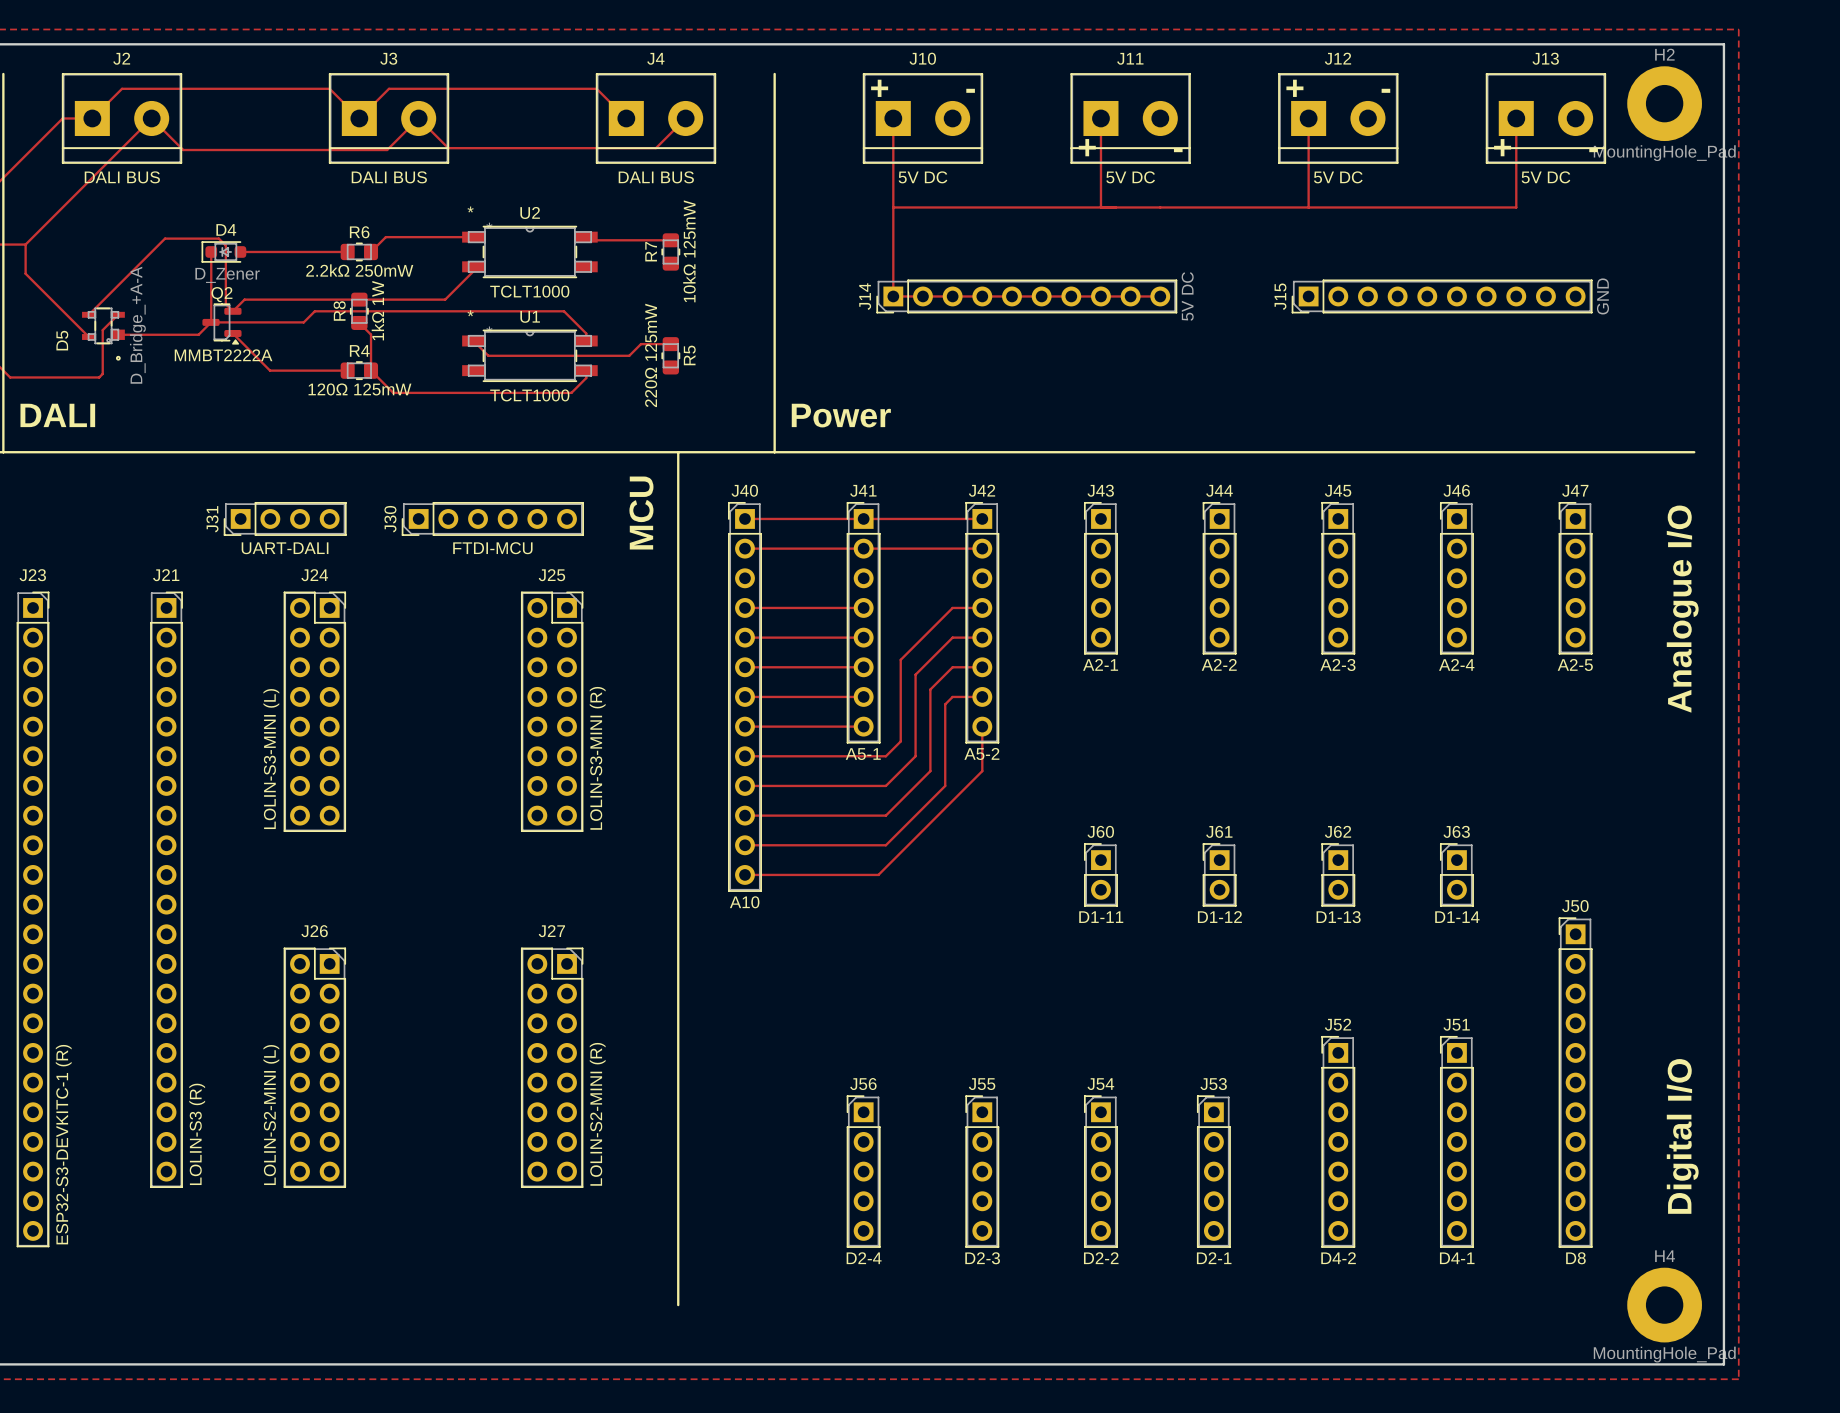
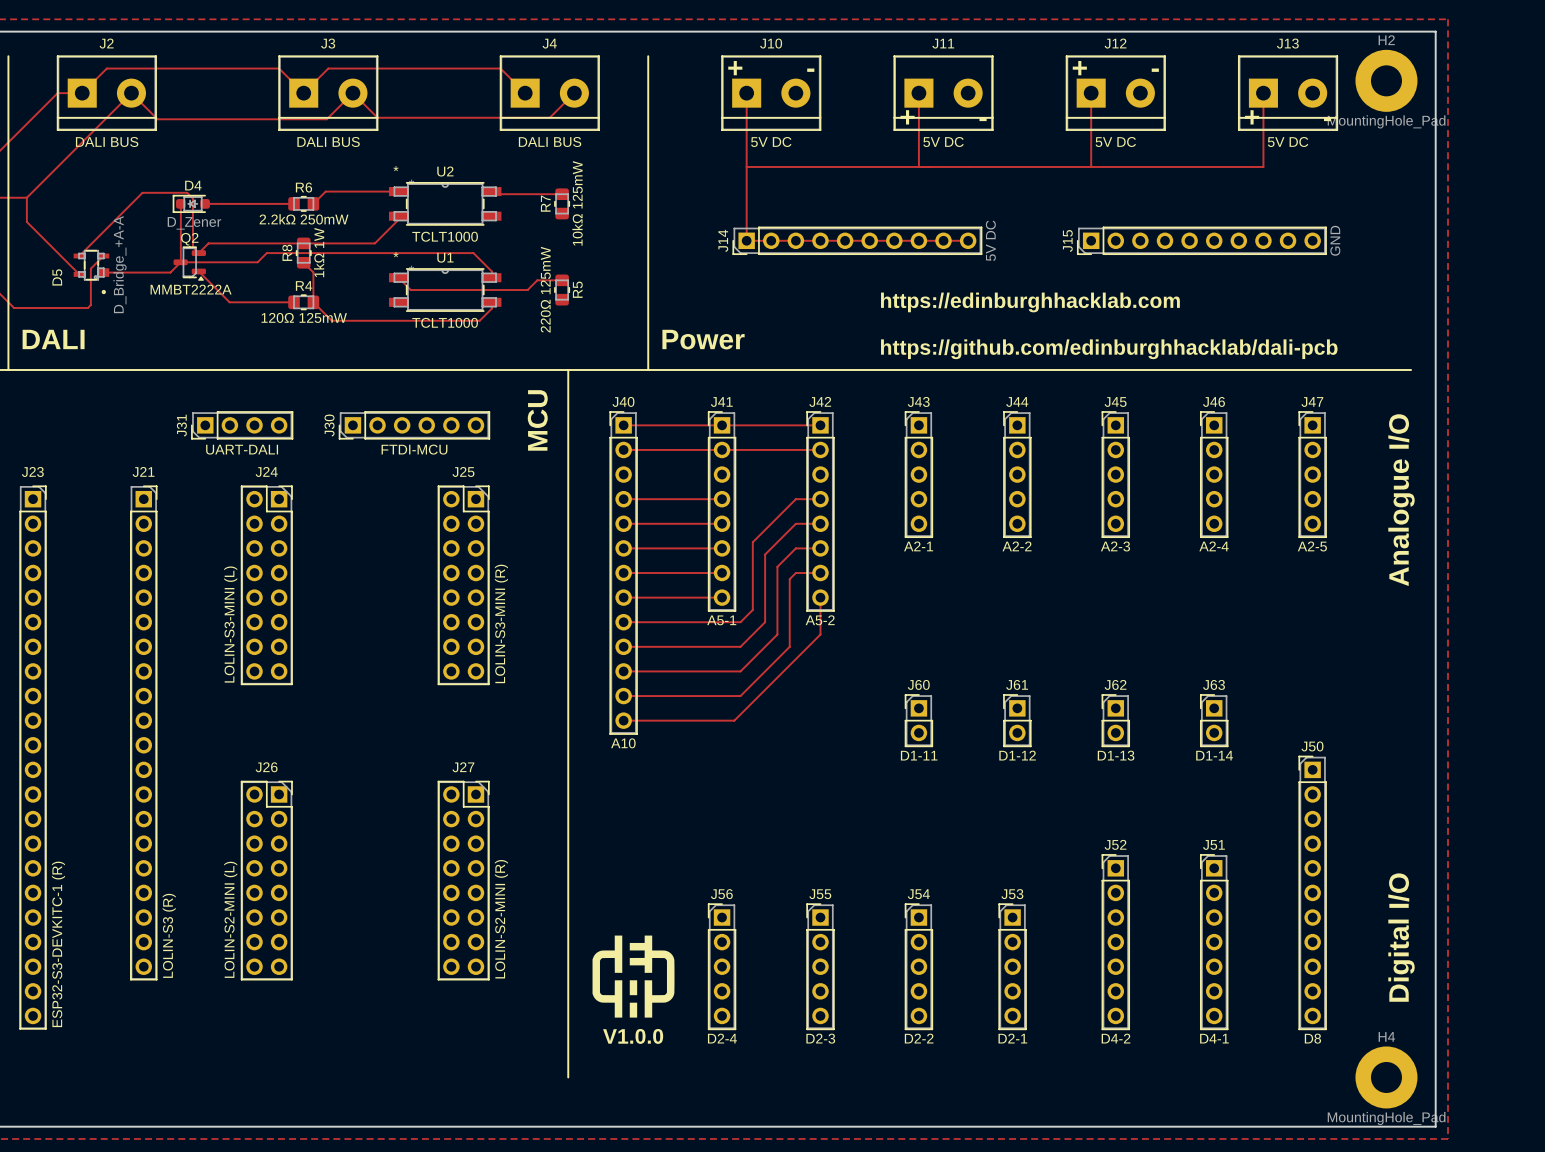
text: none -> https://edinburghhacklab.com (1030, 302)
text: none -> https://github.com/edinburghhacklab/dali-pcb (1109, 349)
drawing: none -> [592, 935, 675, 1018]
text: none -> V1.0.0 (633, 1036)

